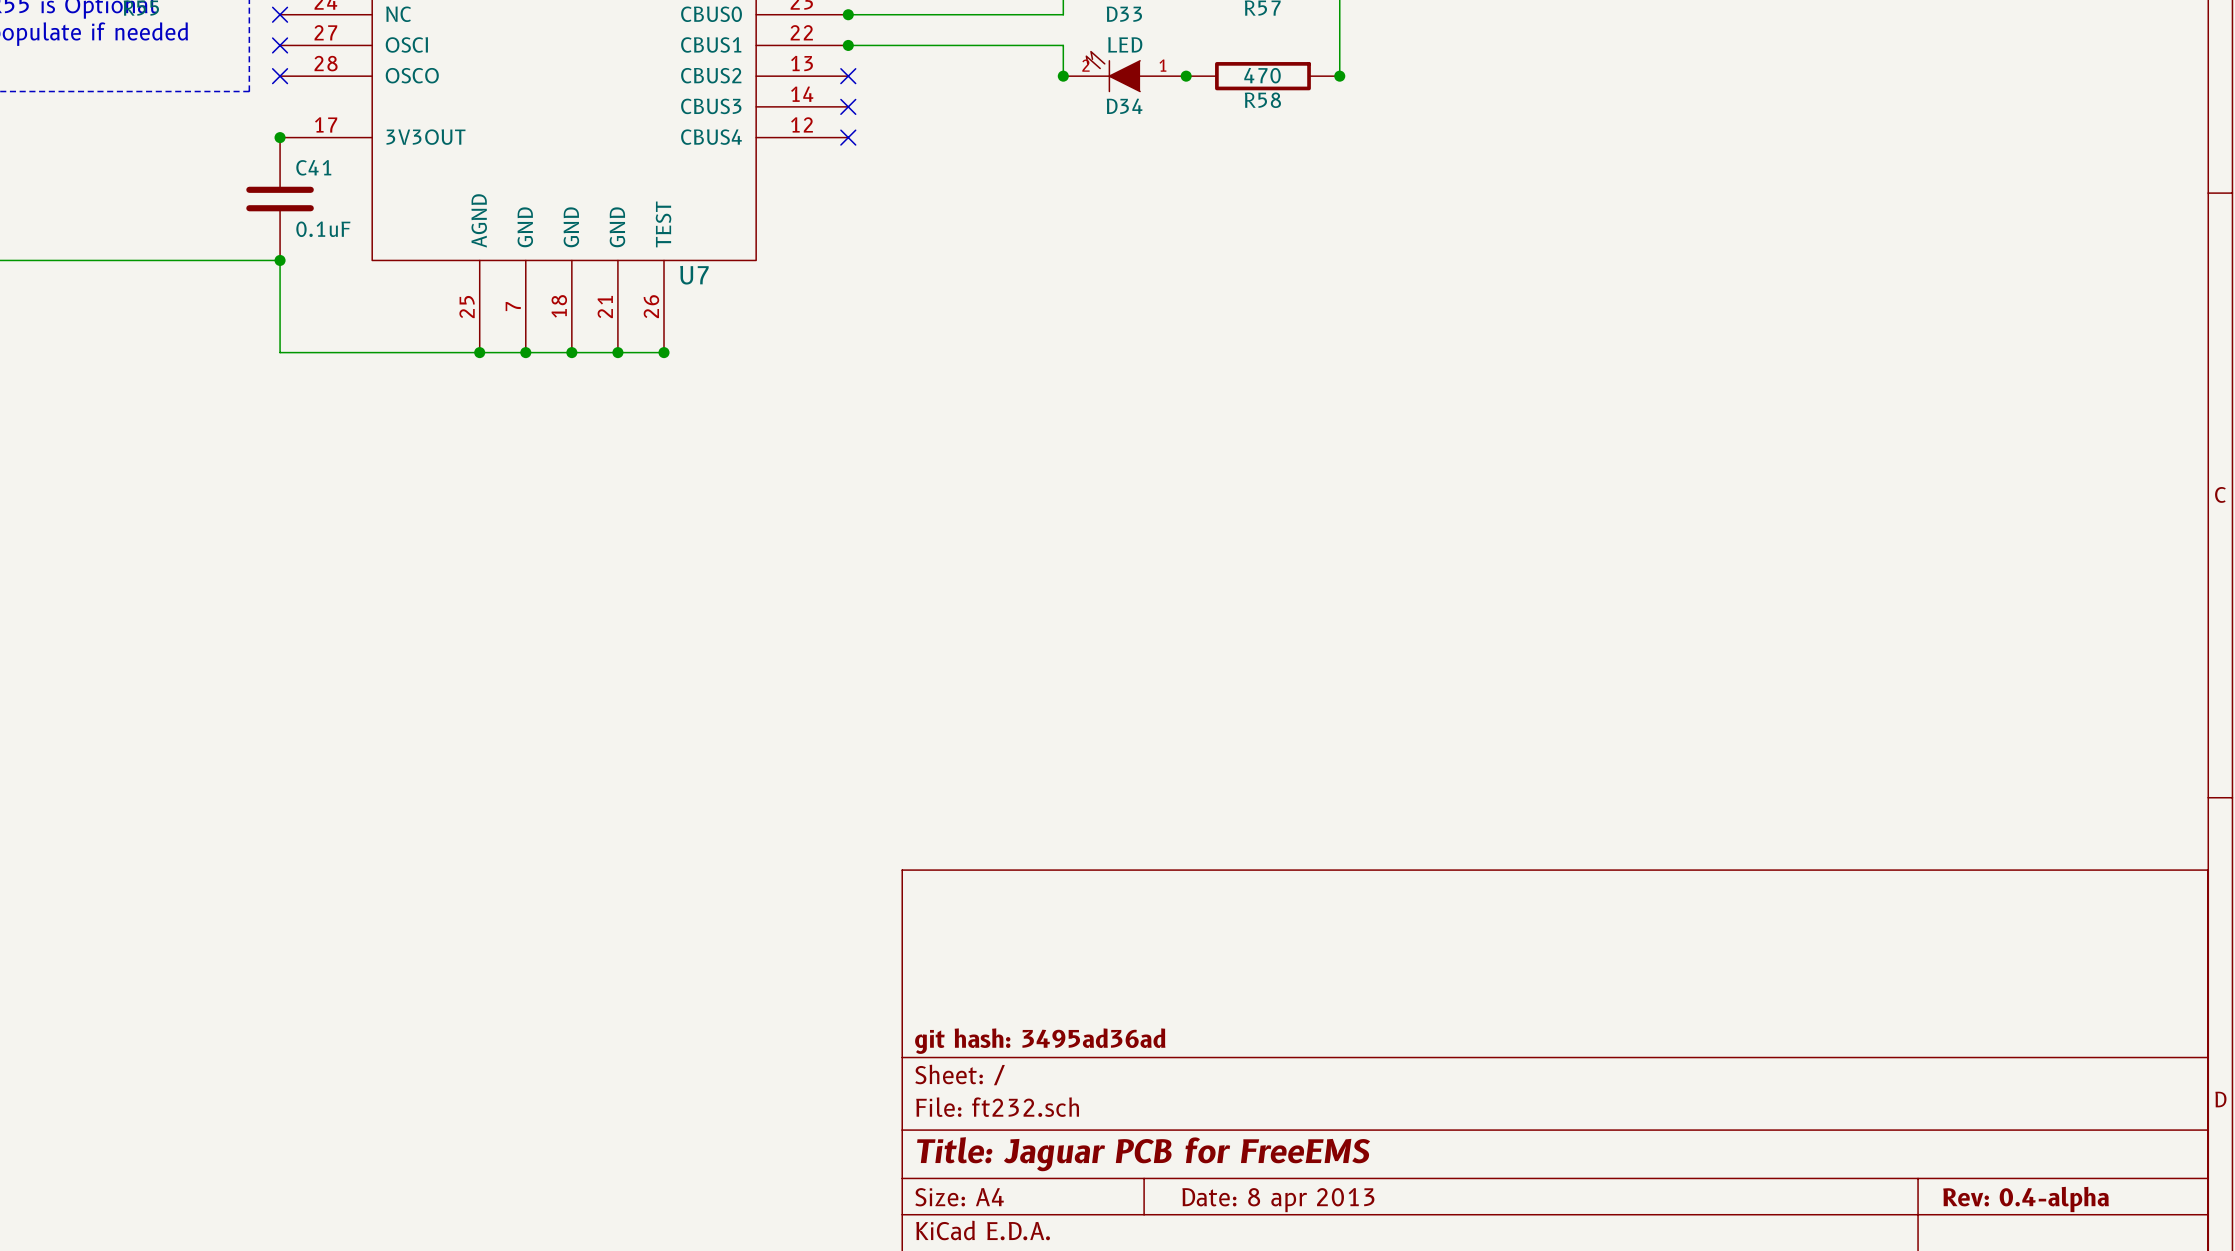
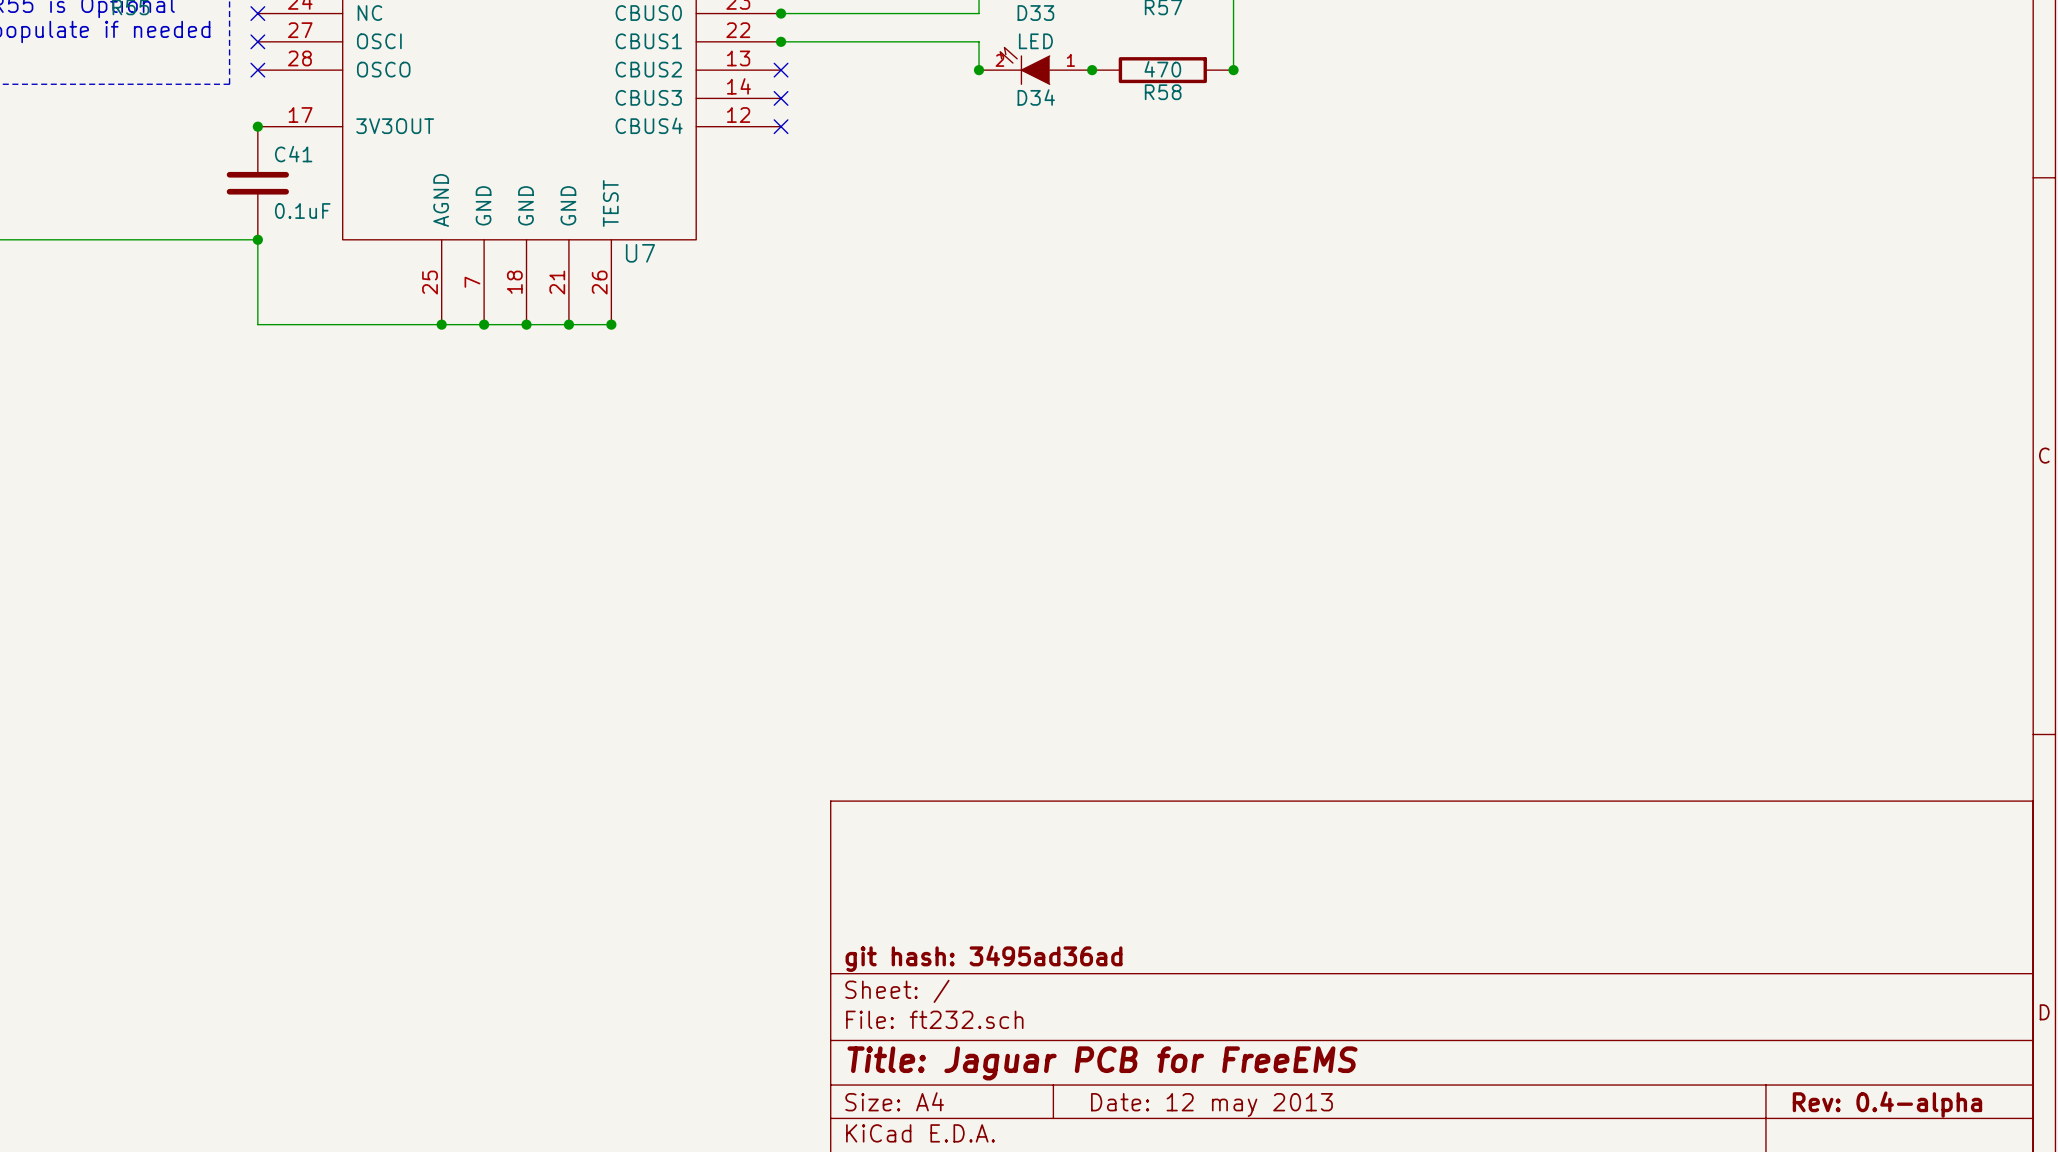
title block: Date: 8 apr 2013 (1278, 1200) -> Date: 12 may 2013 (1211, 1104)

